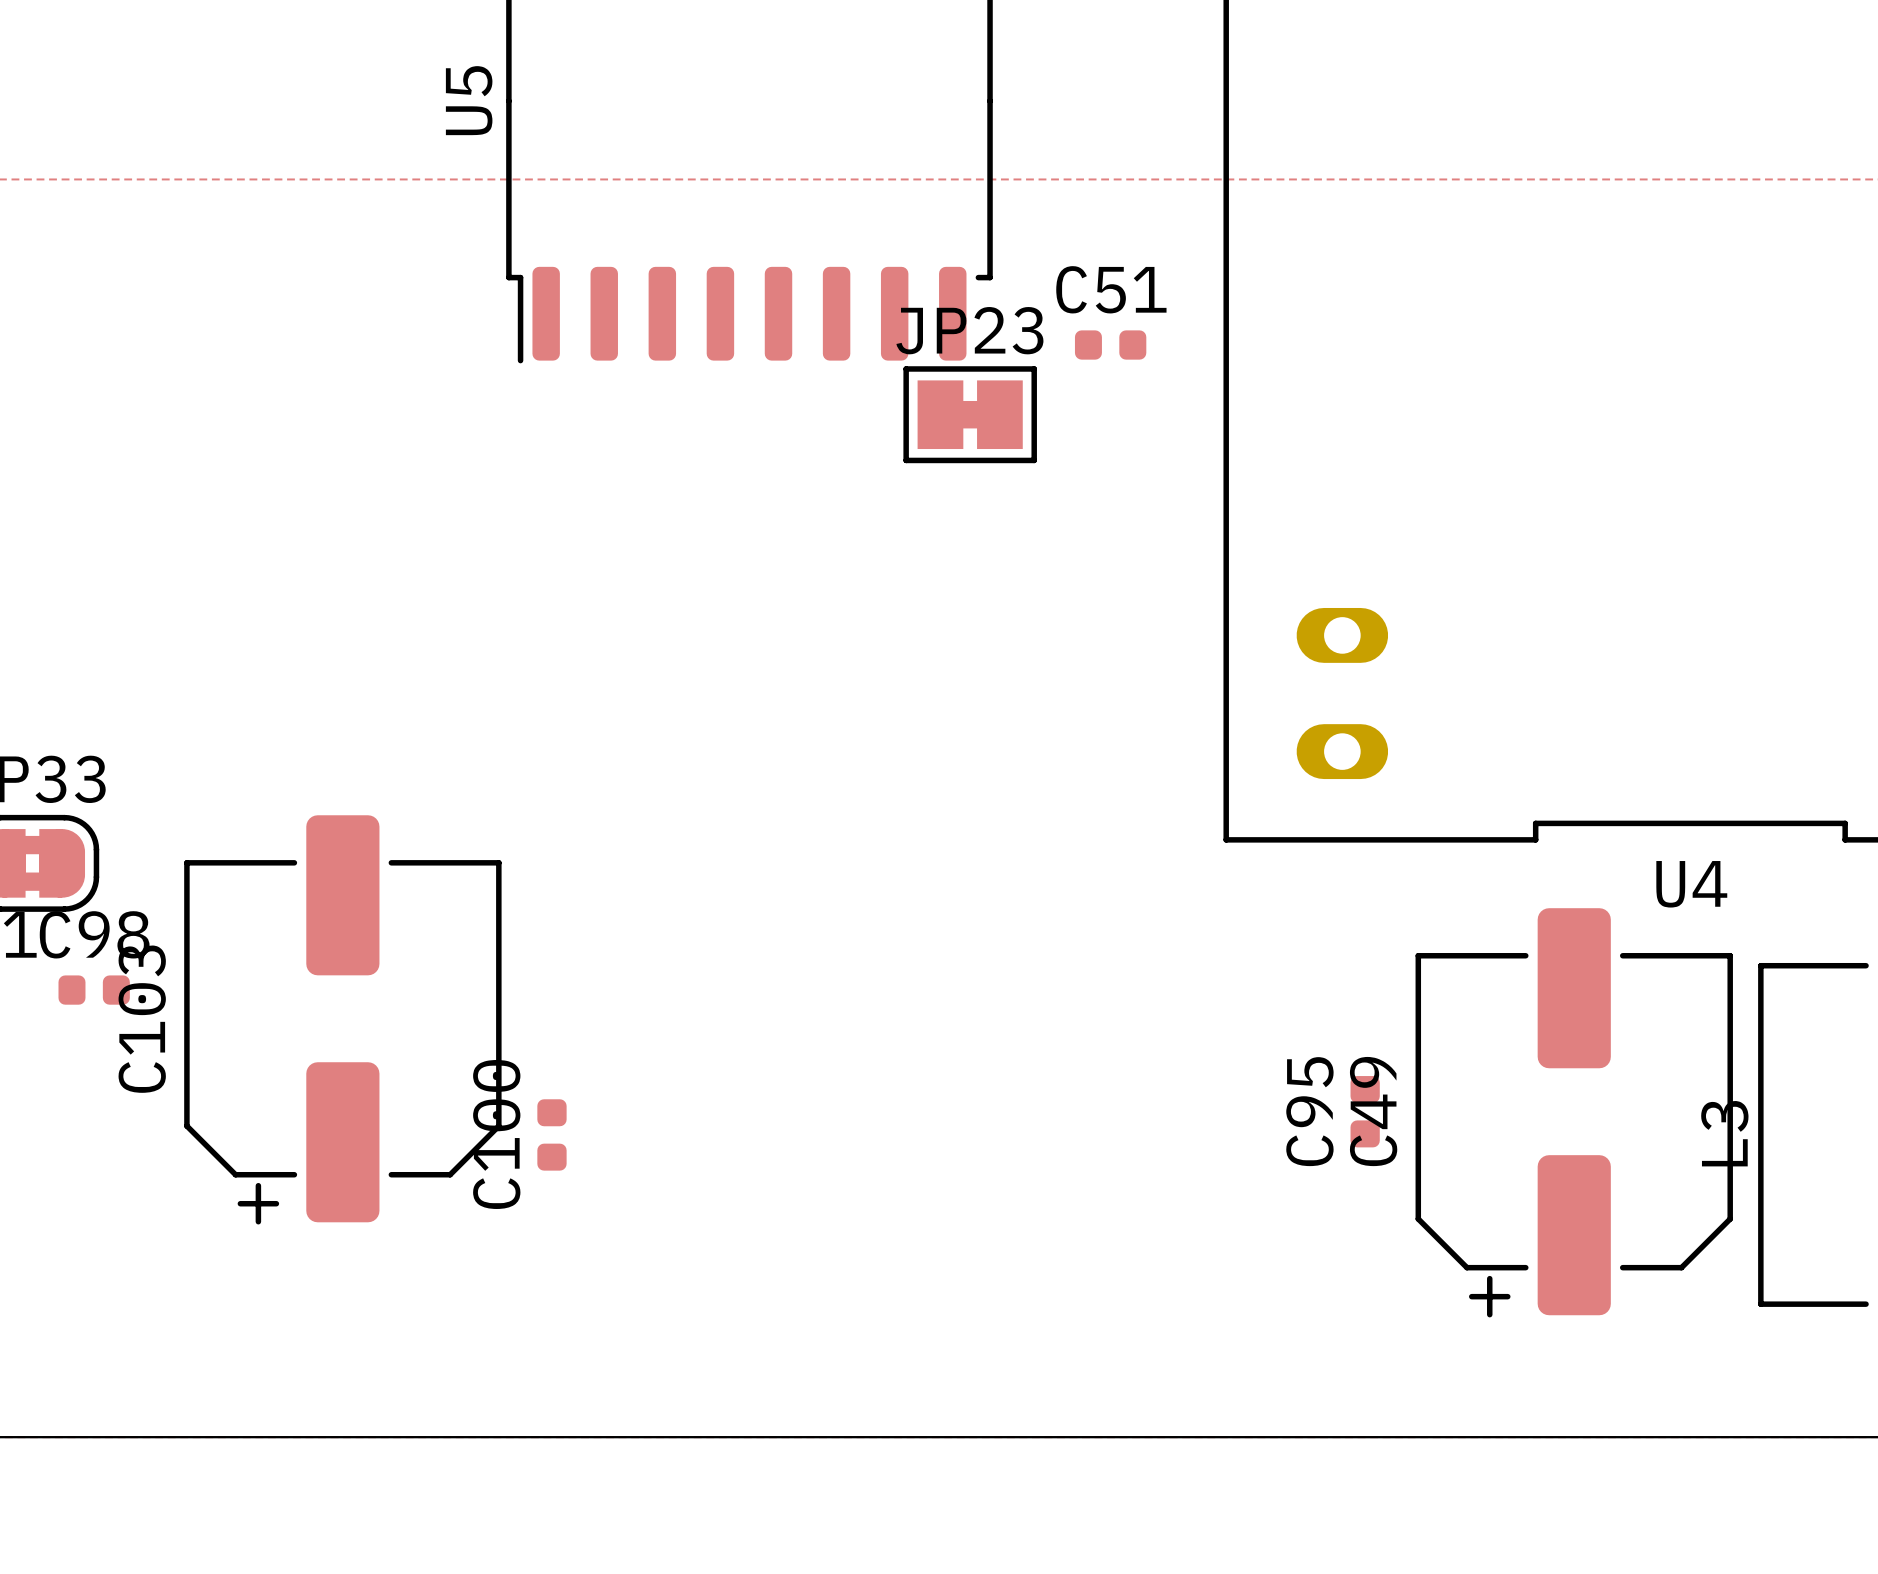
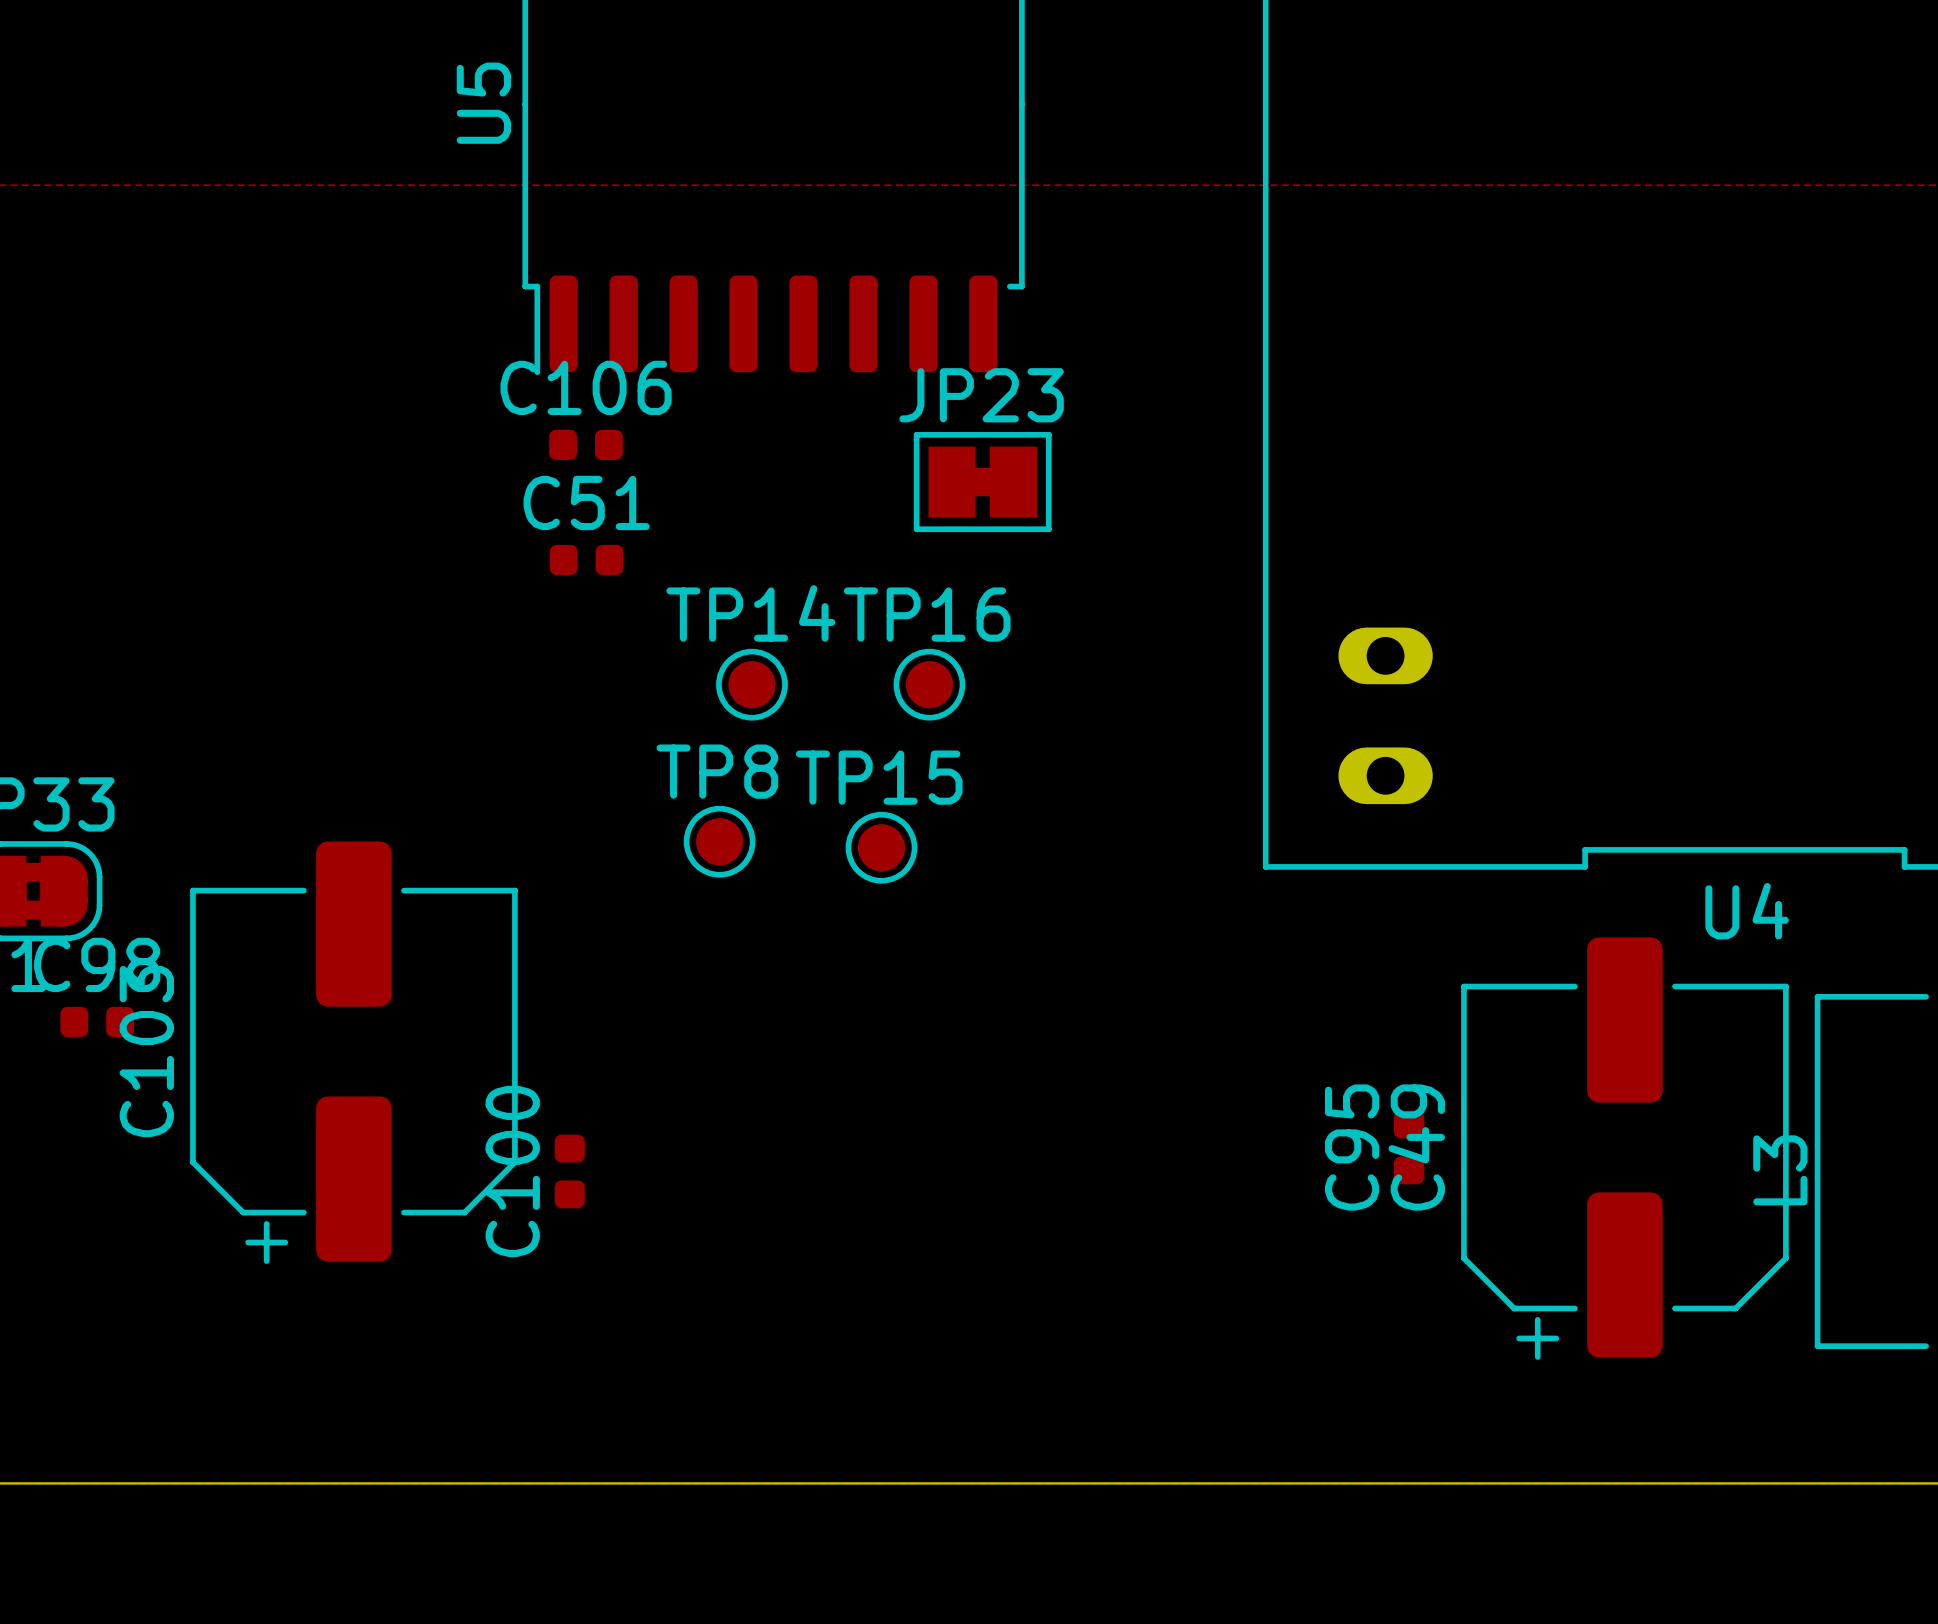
C51 position: (1110, 345) -> (586, 559)
JP23 position: (970, 414) -> (982, 482)
C106: none -> (586, 444)
TP14: none -> (751, 684)
TP16: none -> (929, 684)
TP8: none -> (719, 841)
TP15: none -> (881, 847)

